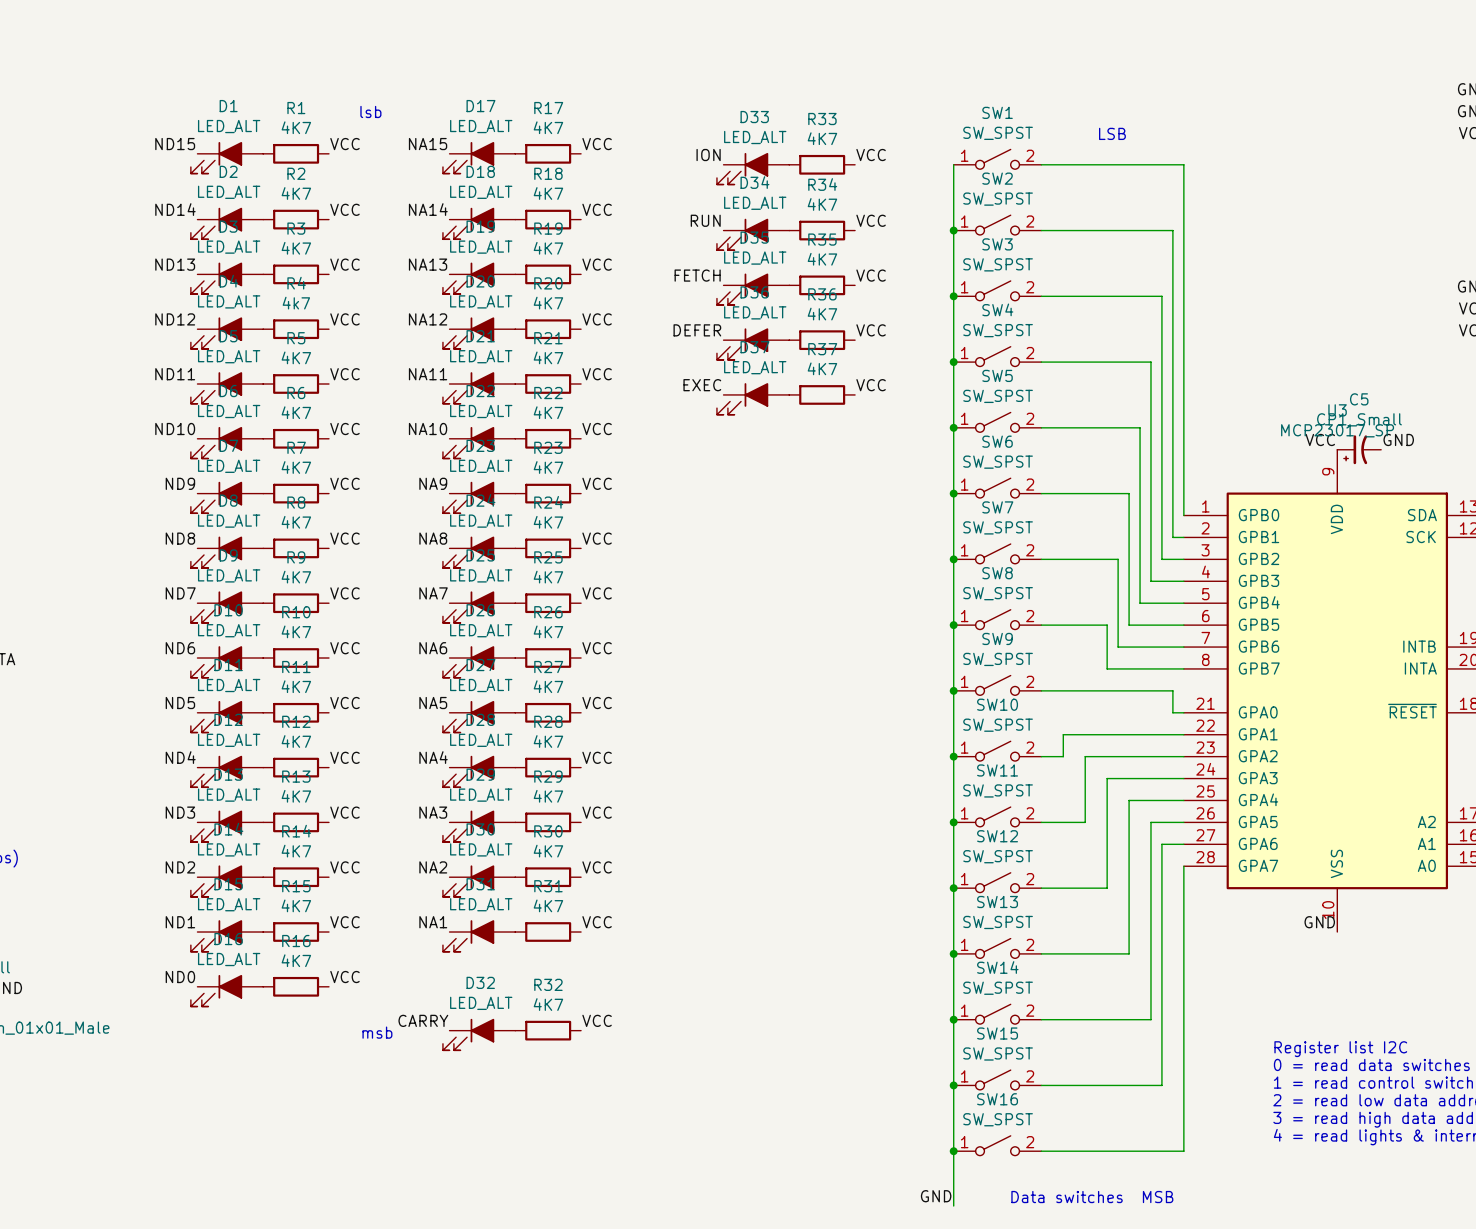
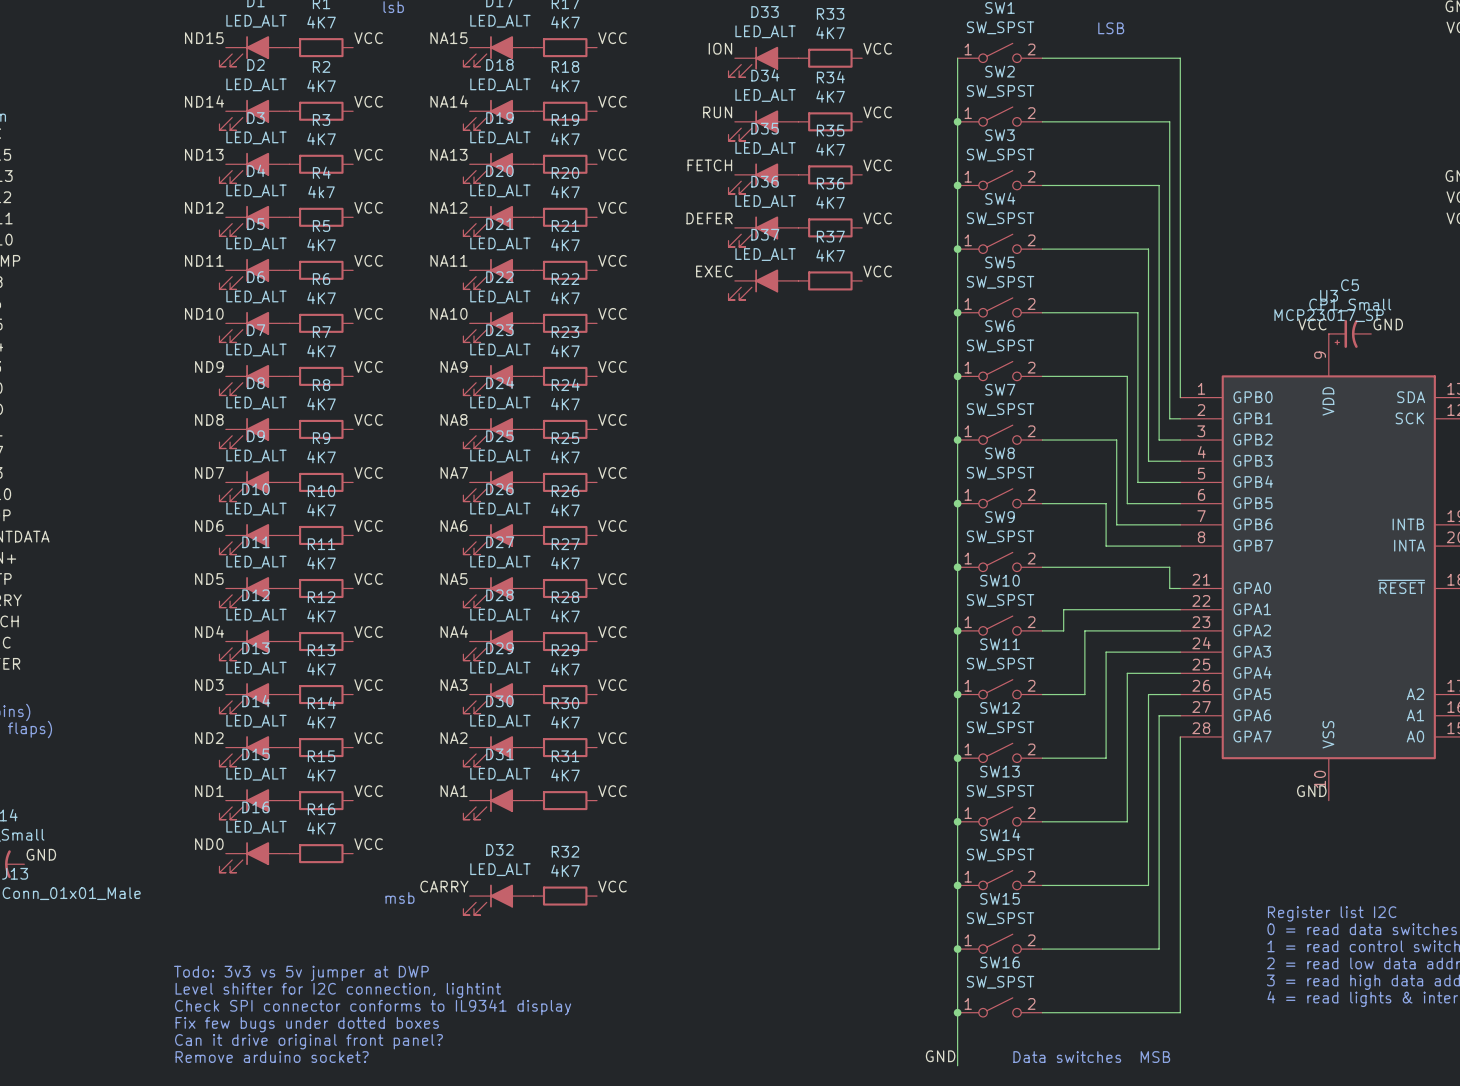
text: none -> Todo: 3v3 vs 5v jumper at DWP (301, 973)
text: none -> Level shifter for I2C connection, lightint (338, 990)
text: none -> Check SPI connector conforms to IL9341 display (373, 1007)
text: none -> Fix few bugs under dotted boxes (307, 1024)
text: none -> Can it drive original front panel? (308, 1041)
text: none -> Remove arduino socket? (272, 1057)

